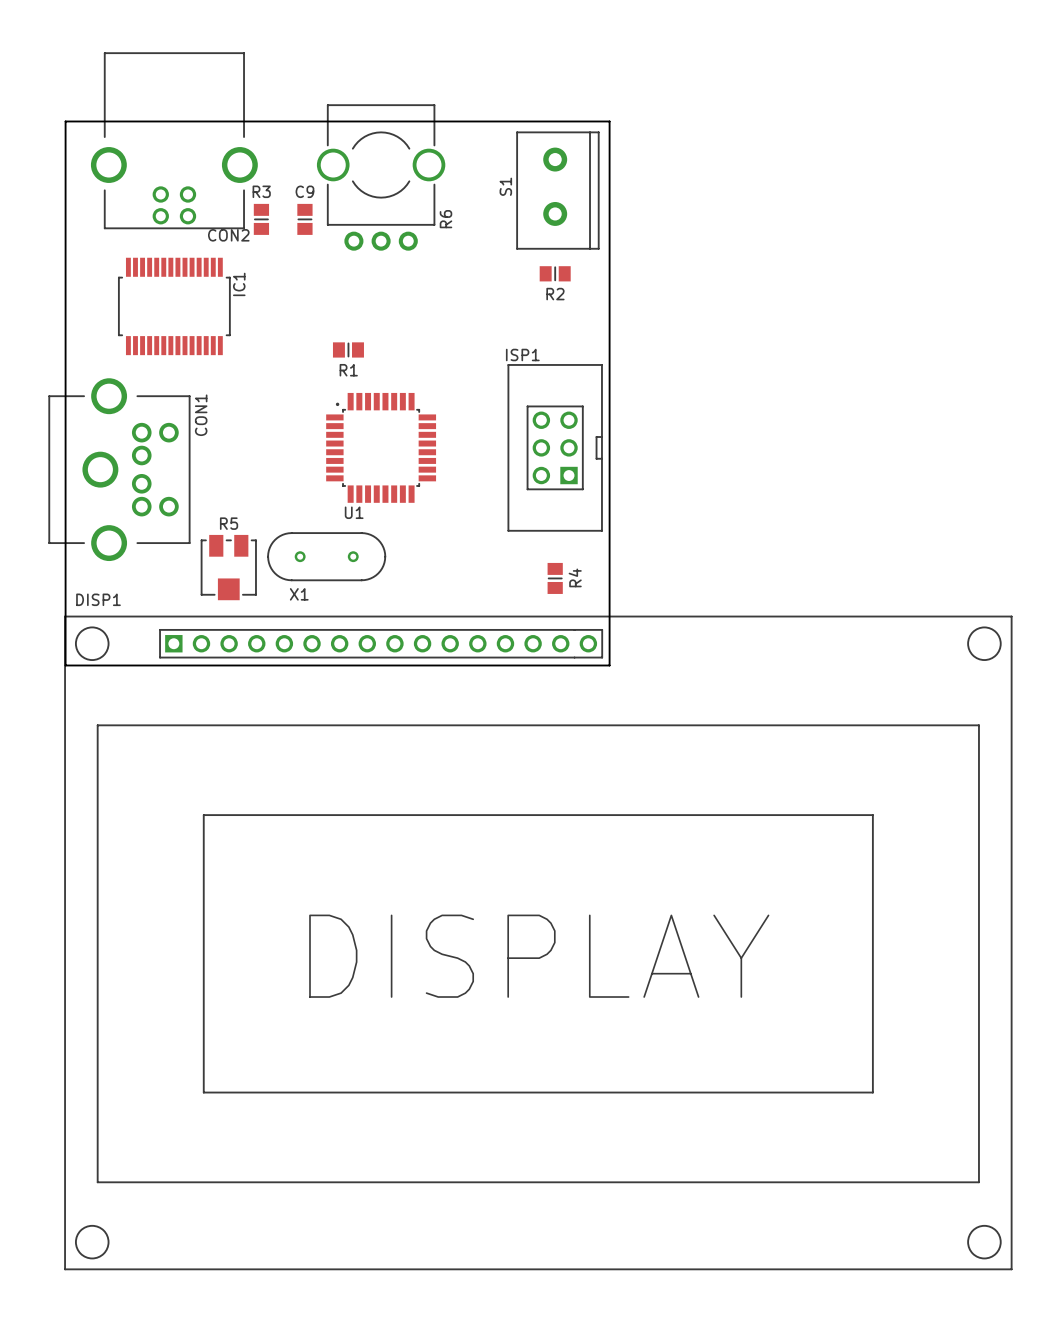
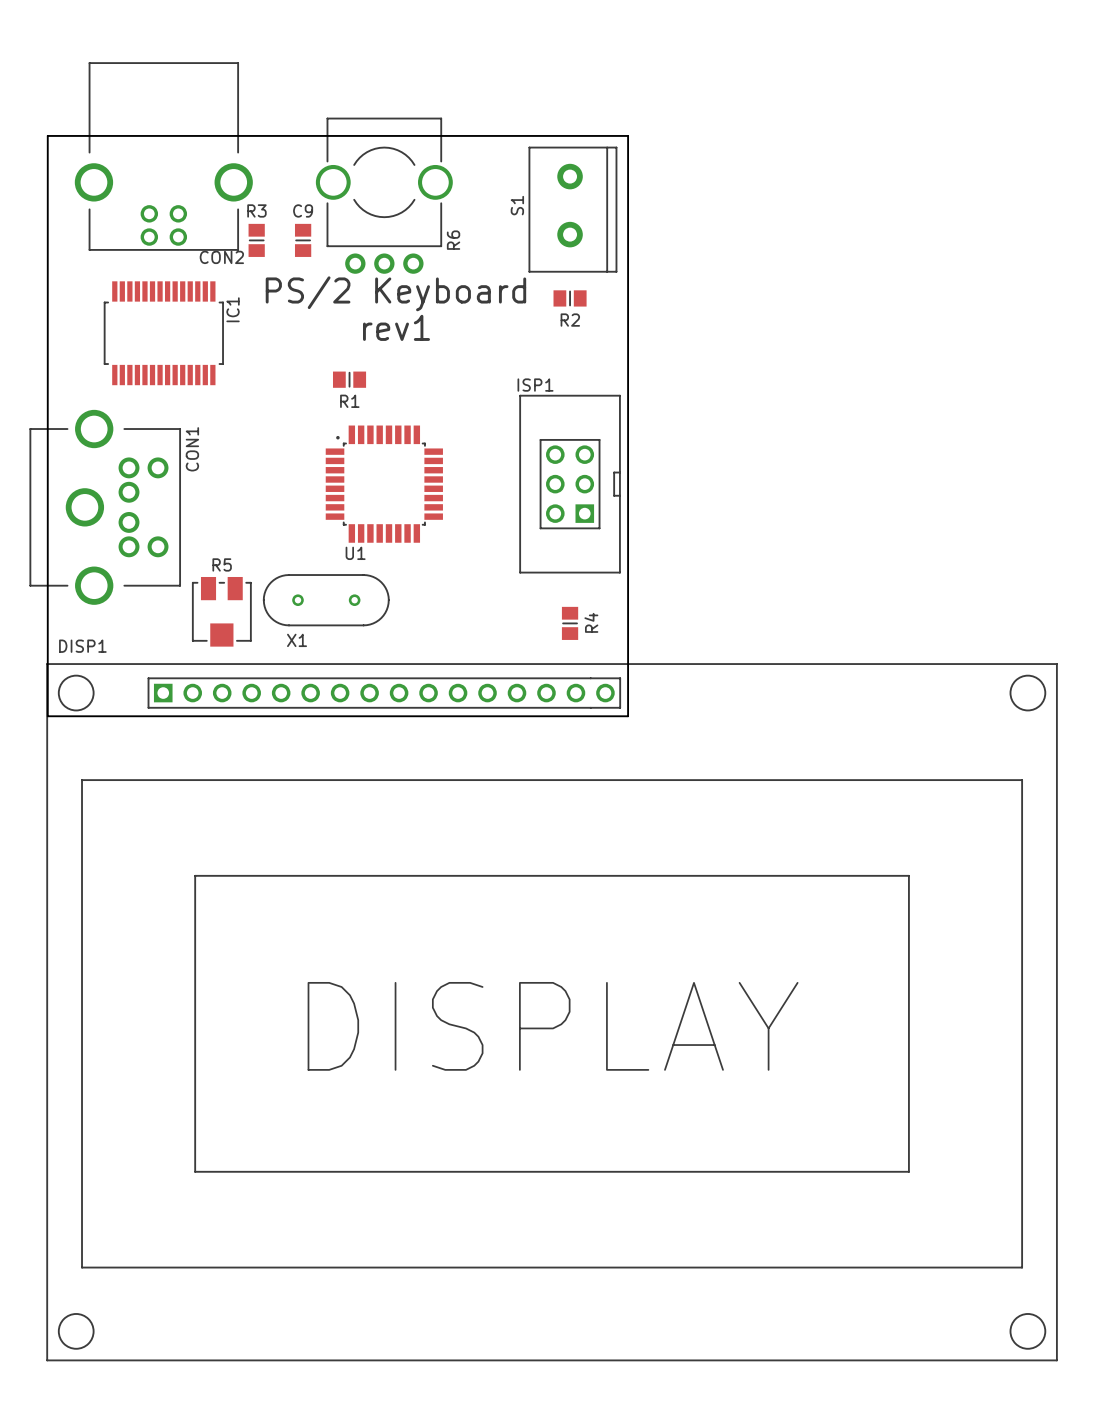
text: none -> PS/2 Keyboard (395, 293)
text: none -> rev1 (396, 327)

